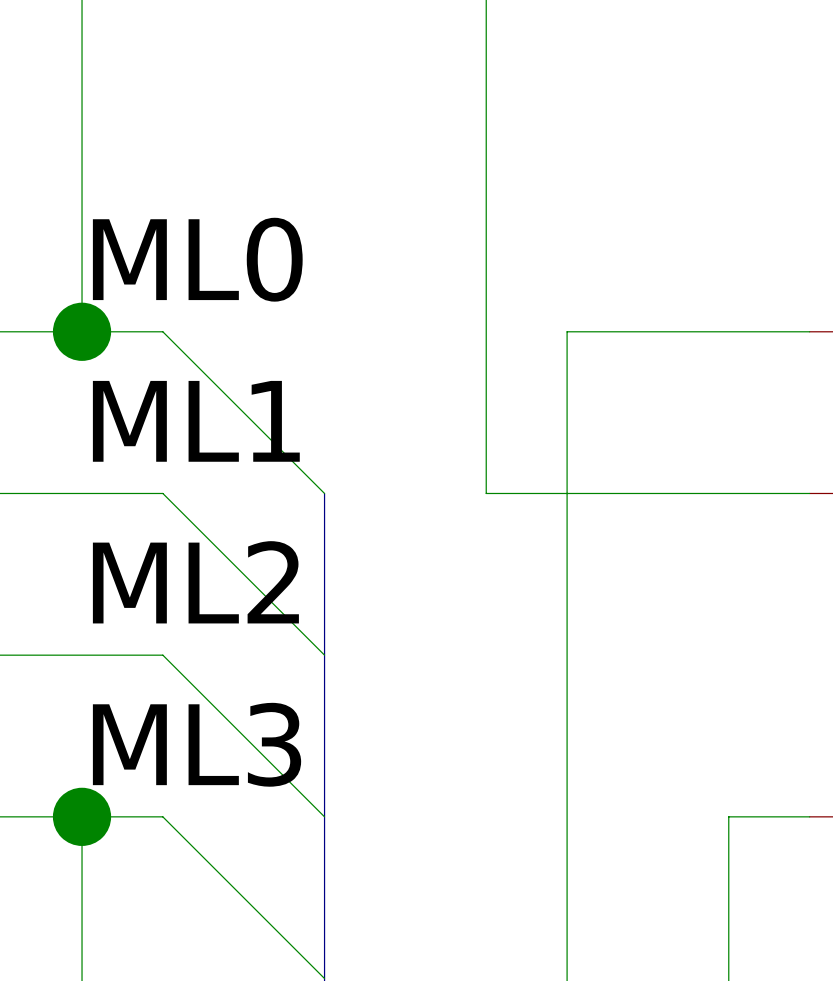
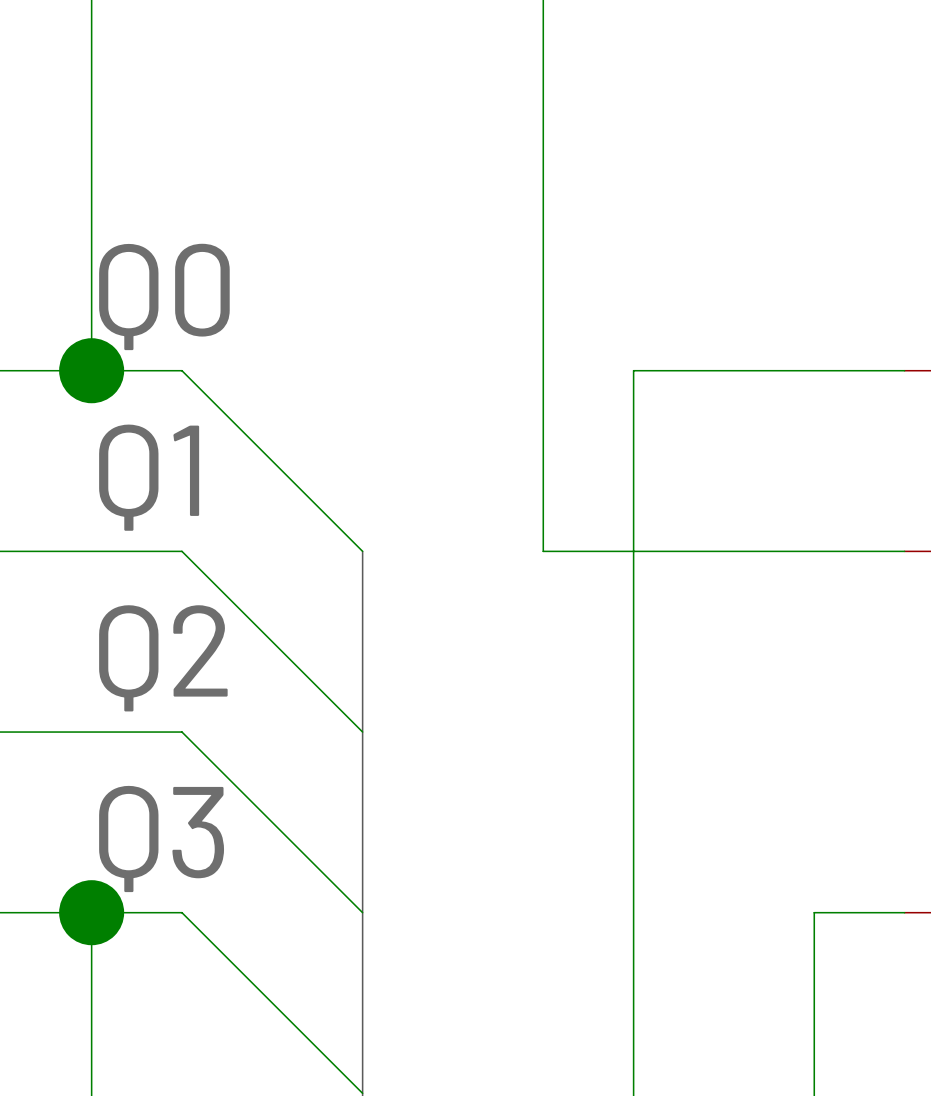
label: ML0 (197, 259) -> Q0 (164, 296)
label: ML1 (196, 421) -> Q1 (149, 477)
label: ML2 (195, 582) -> Q2 (163, 658)
label: ML3 (197, 744) -> Q3 (161, 838)

